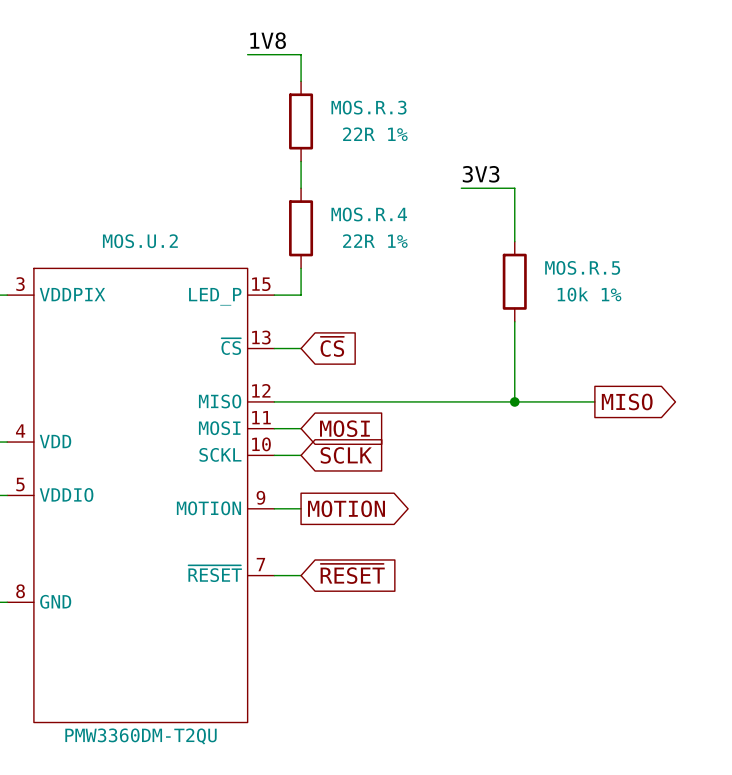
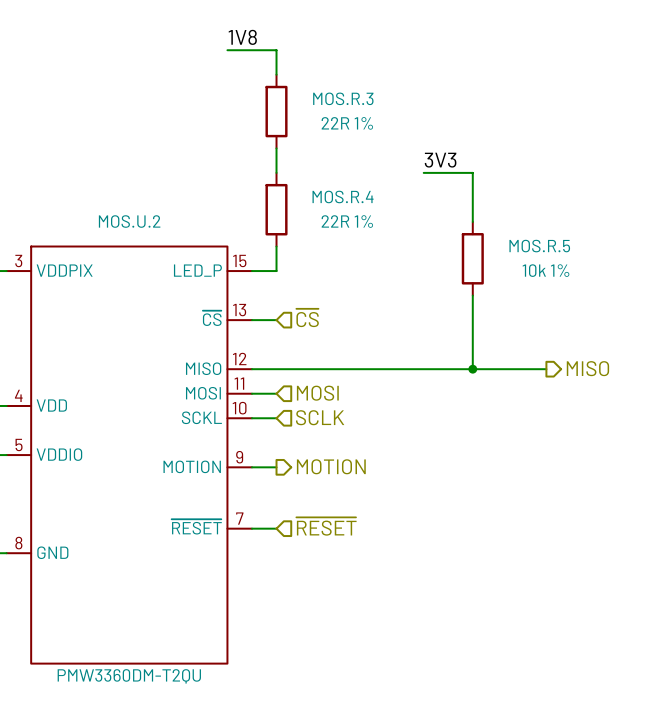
global label: ~{CS} (332, 346) -> none
hierarchical label: none -> ~{CS} (307, 317)
global label: MISO (627, 401) -> none
hierarchical label: none -> MISO (587, 368)
global label: MOSI (344, 428) -> none
hierarchical label: none -> MOSI (317, 393)
hierarchical label: none -> SCLK (320, 417)
global label: SCLK (346, 455) -> none
global label: MOTION (346, 508) -> none
hierarchical label: none -> MOTION (331, 466)
global label: ~{RESET} (352, 573) -> none
hierarchical label: none -> ~{RESET} (326, 526)

